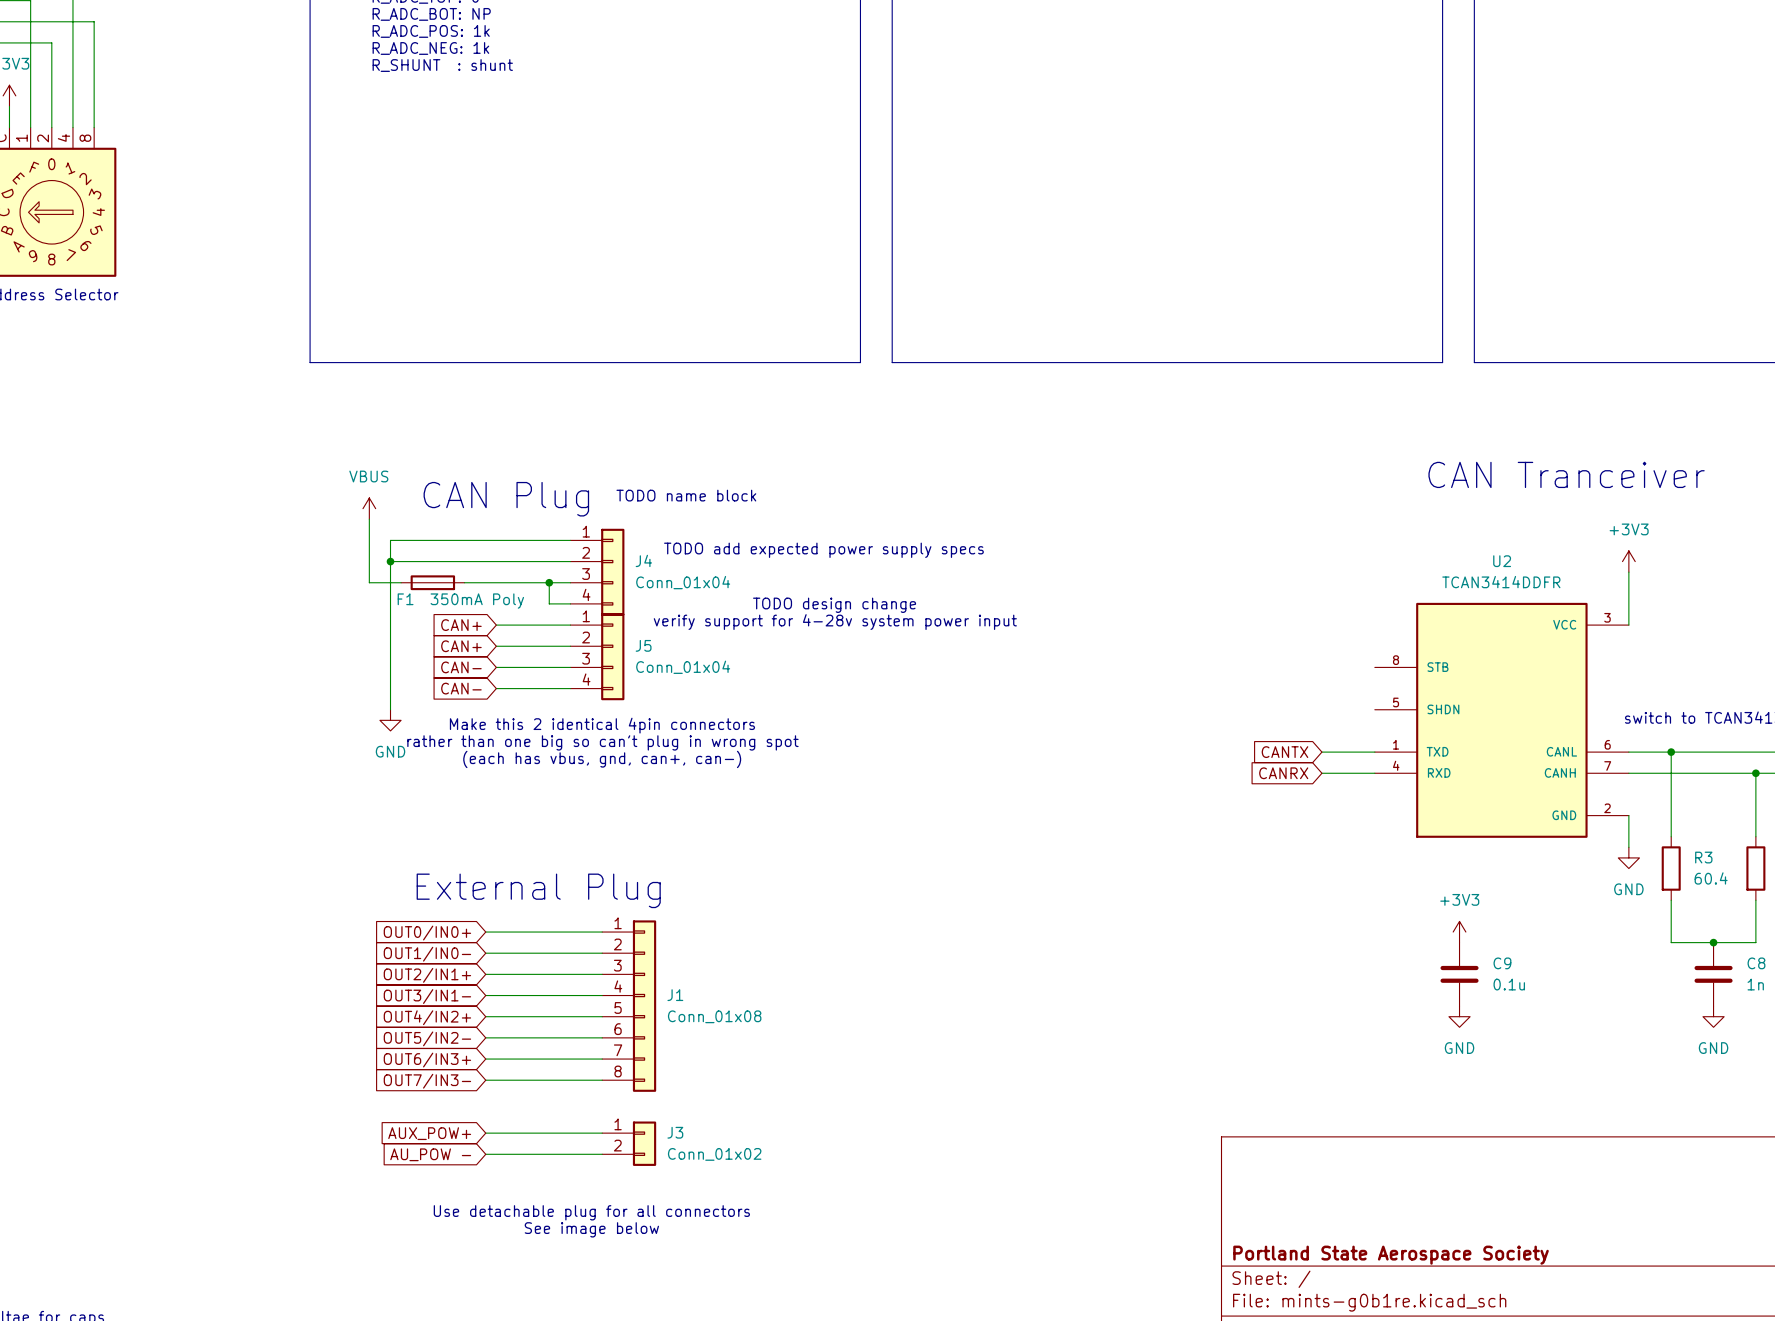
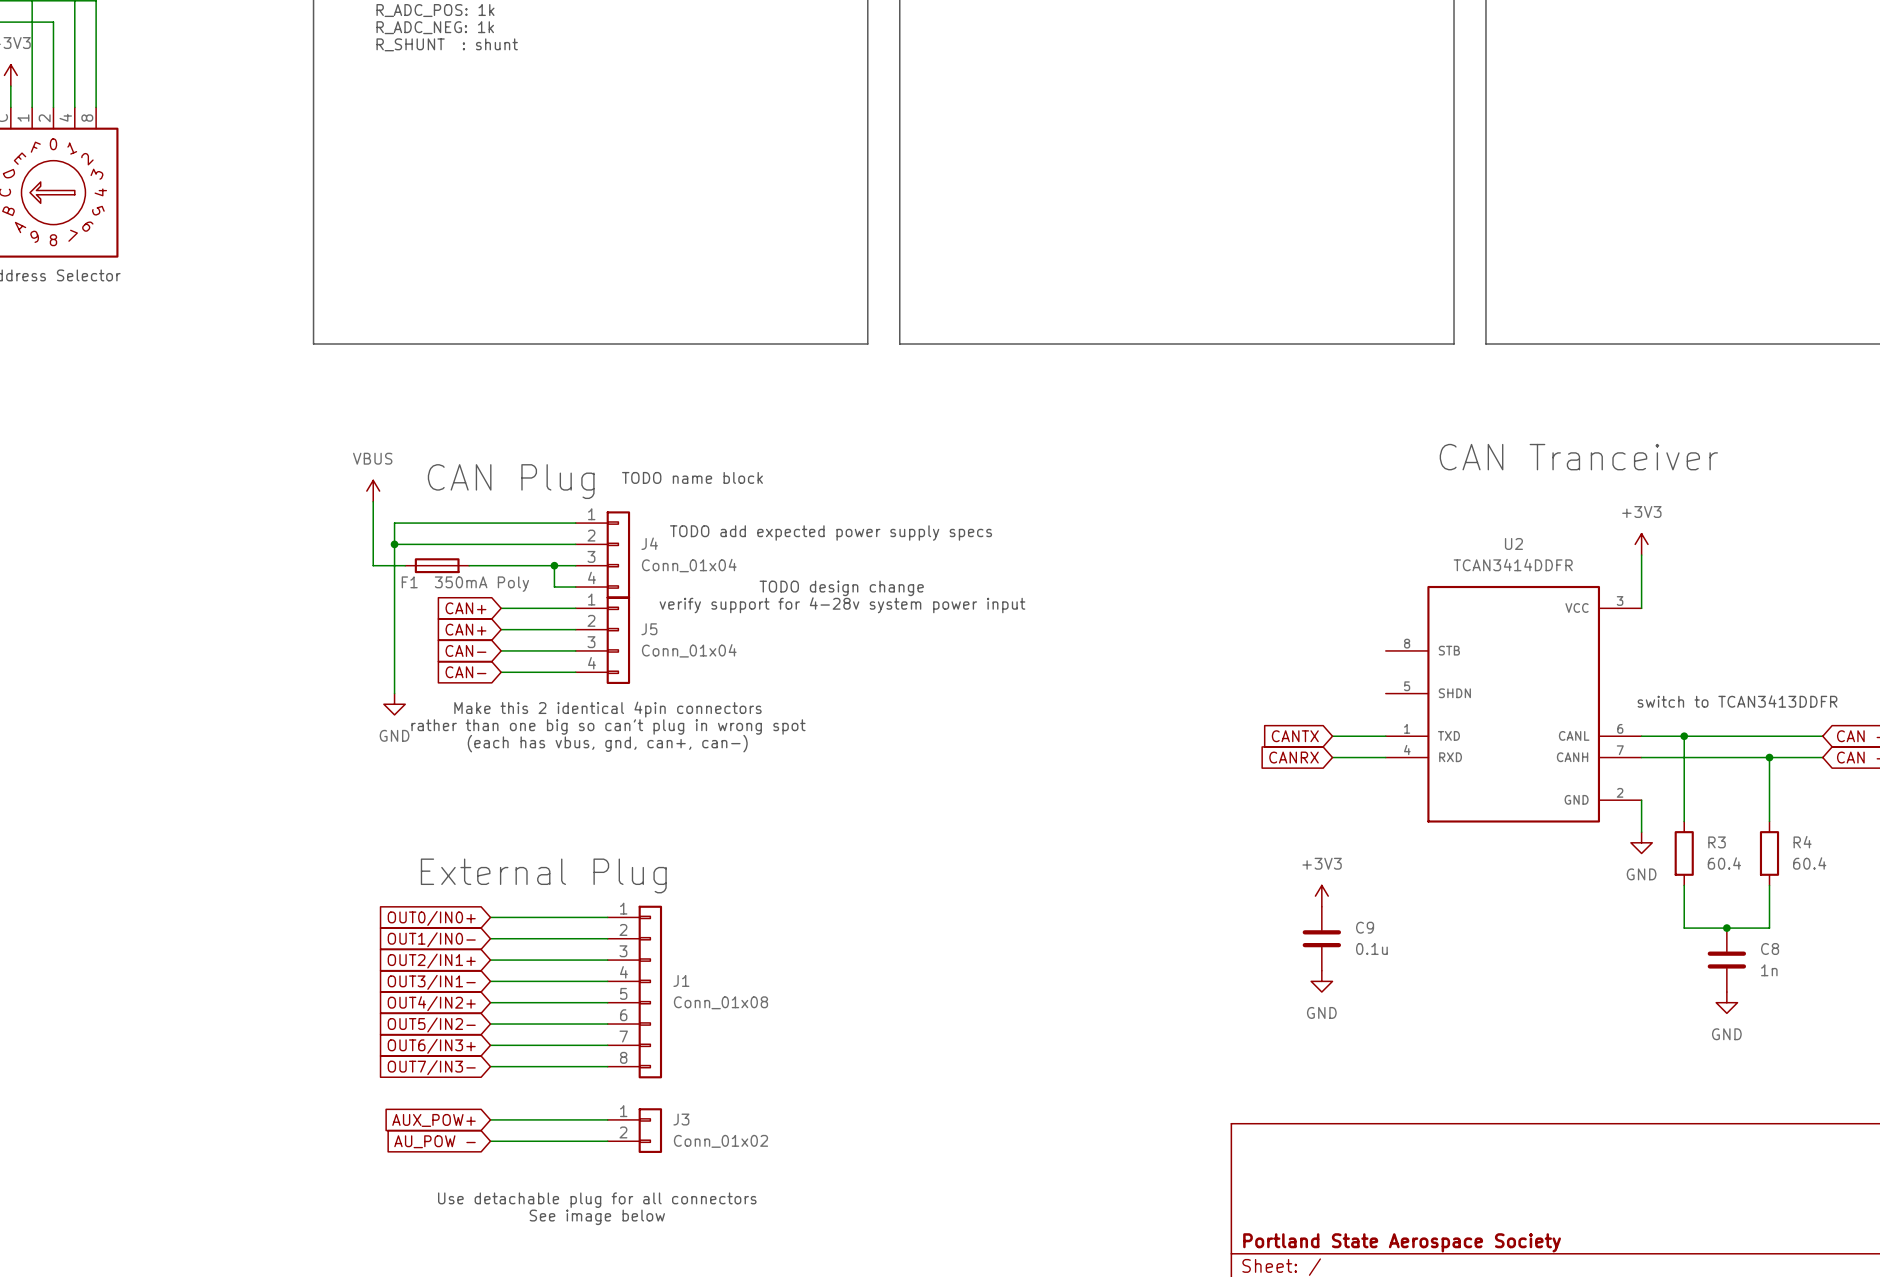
power symbol position: +3V3 (1459, 932) -> +3V3 (1321, 896)
C9 position: (1459, 974) -> (1321, 938)
power symbol position: GND (1459, 1016) -> GND (1321, 981)

